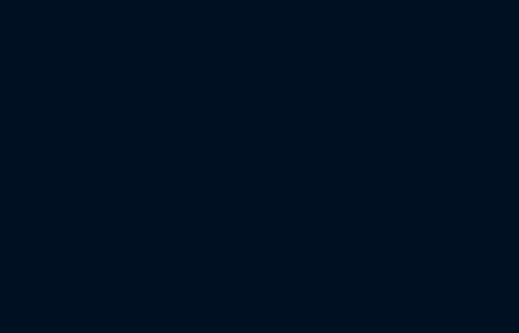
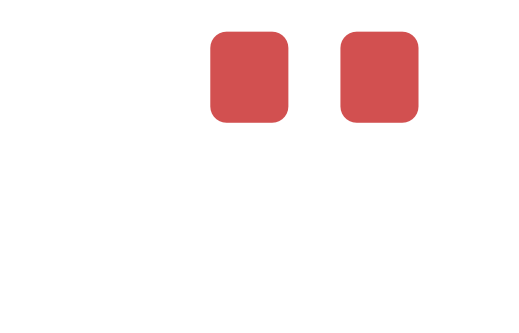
part: none -> (314, 77)

